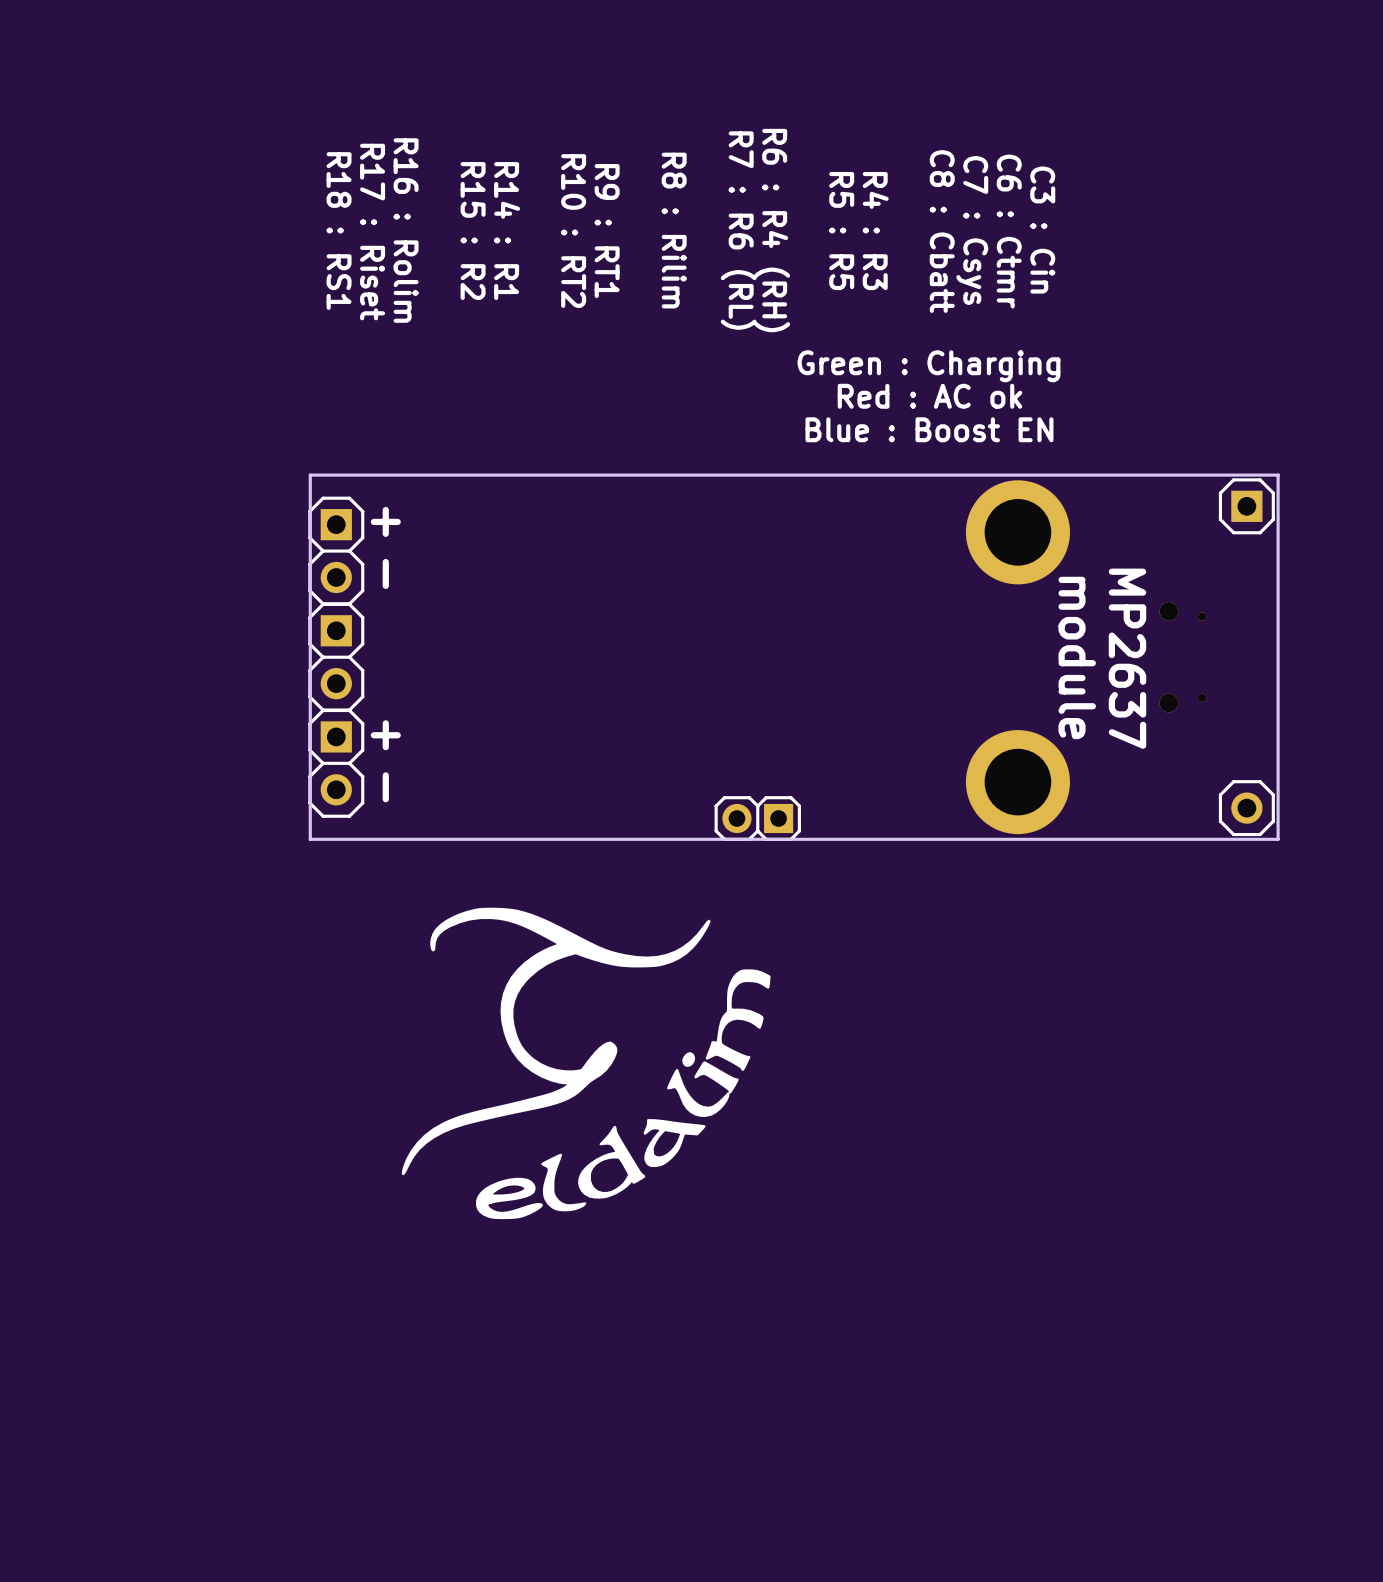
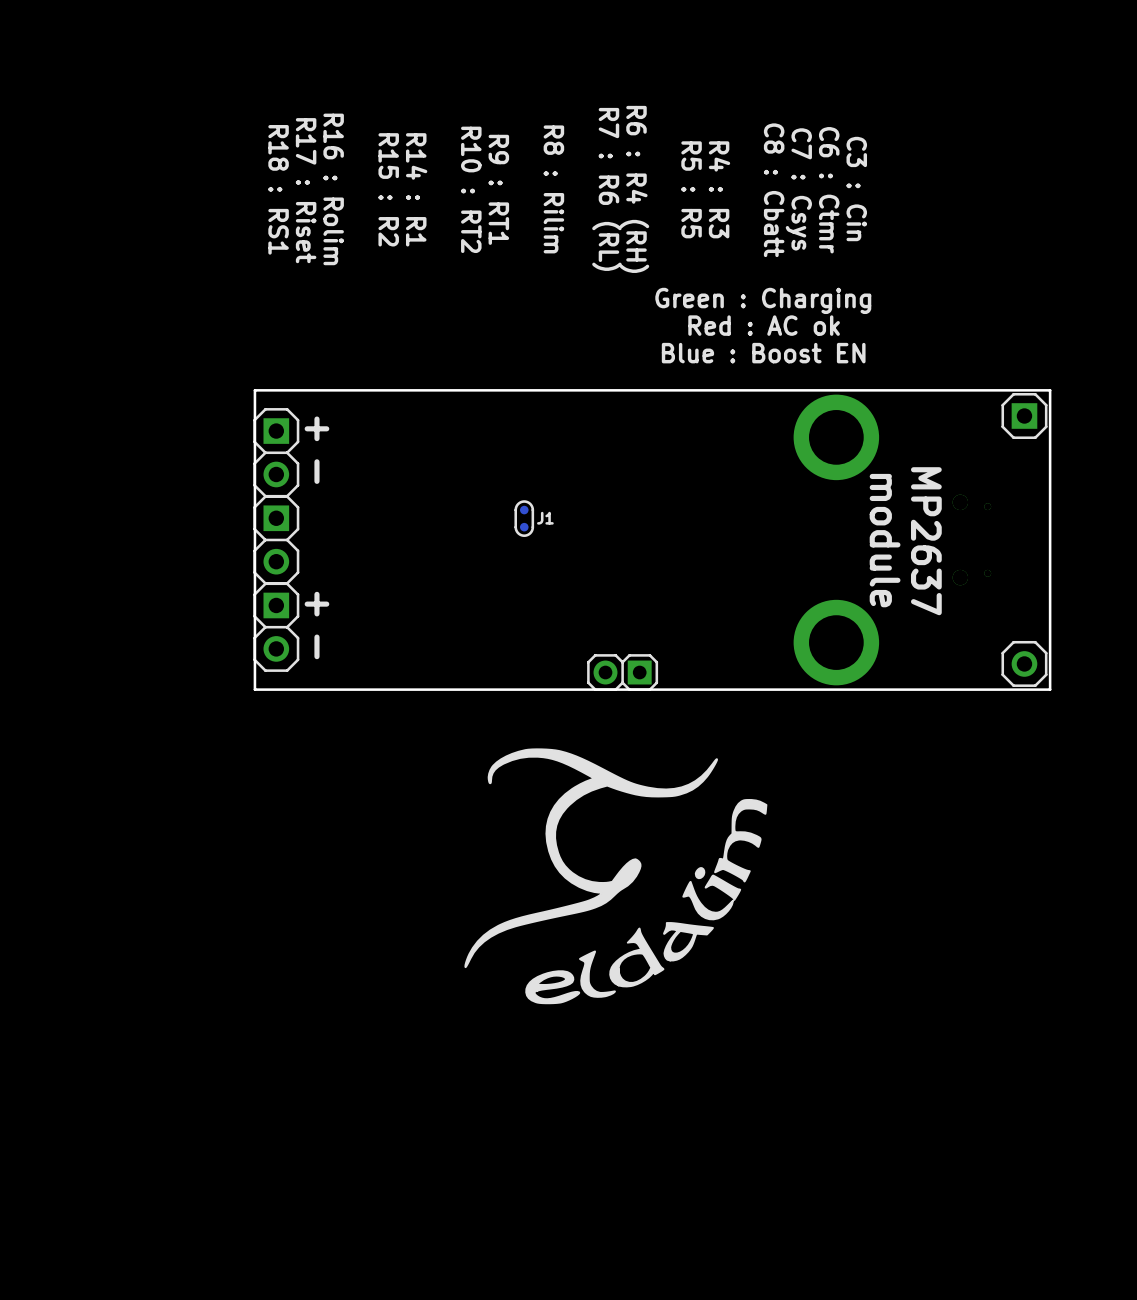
J1: none -> (524, 518)
drawing position: (586, 1063) -> (615, 876)

